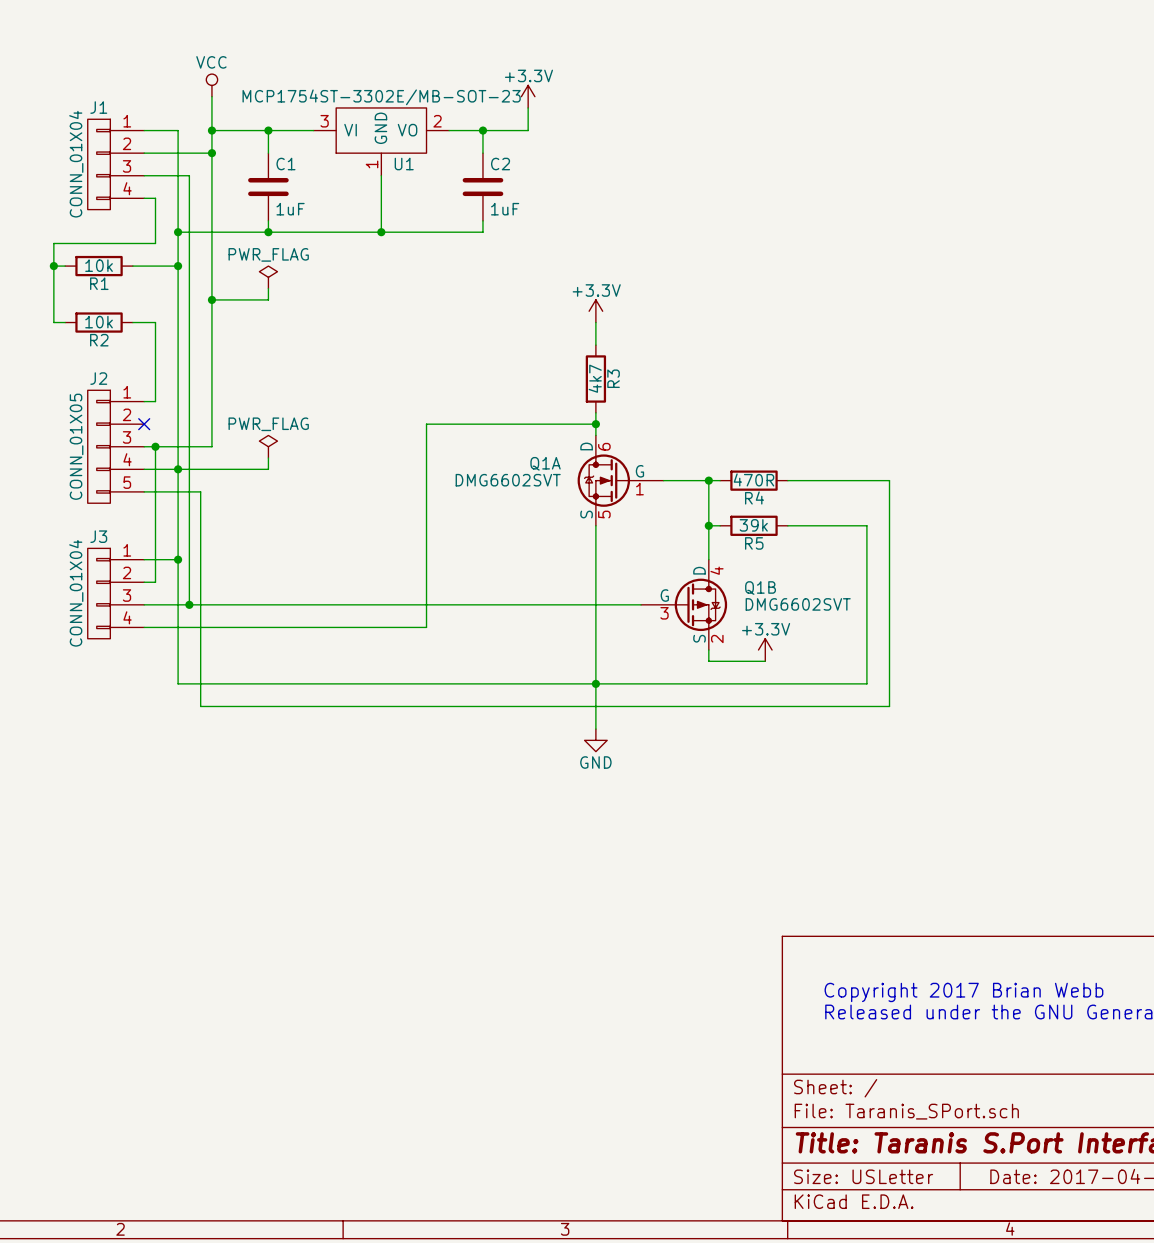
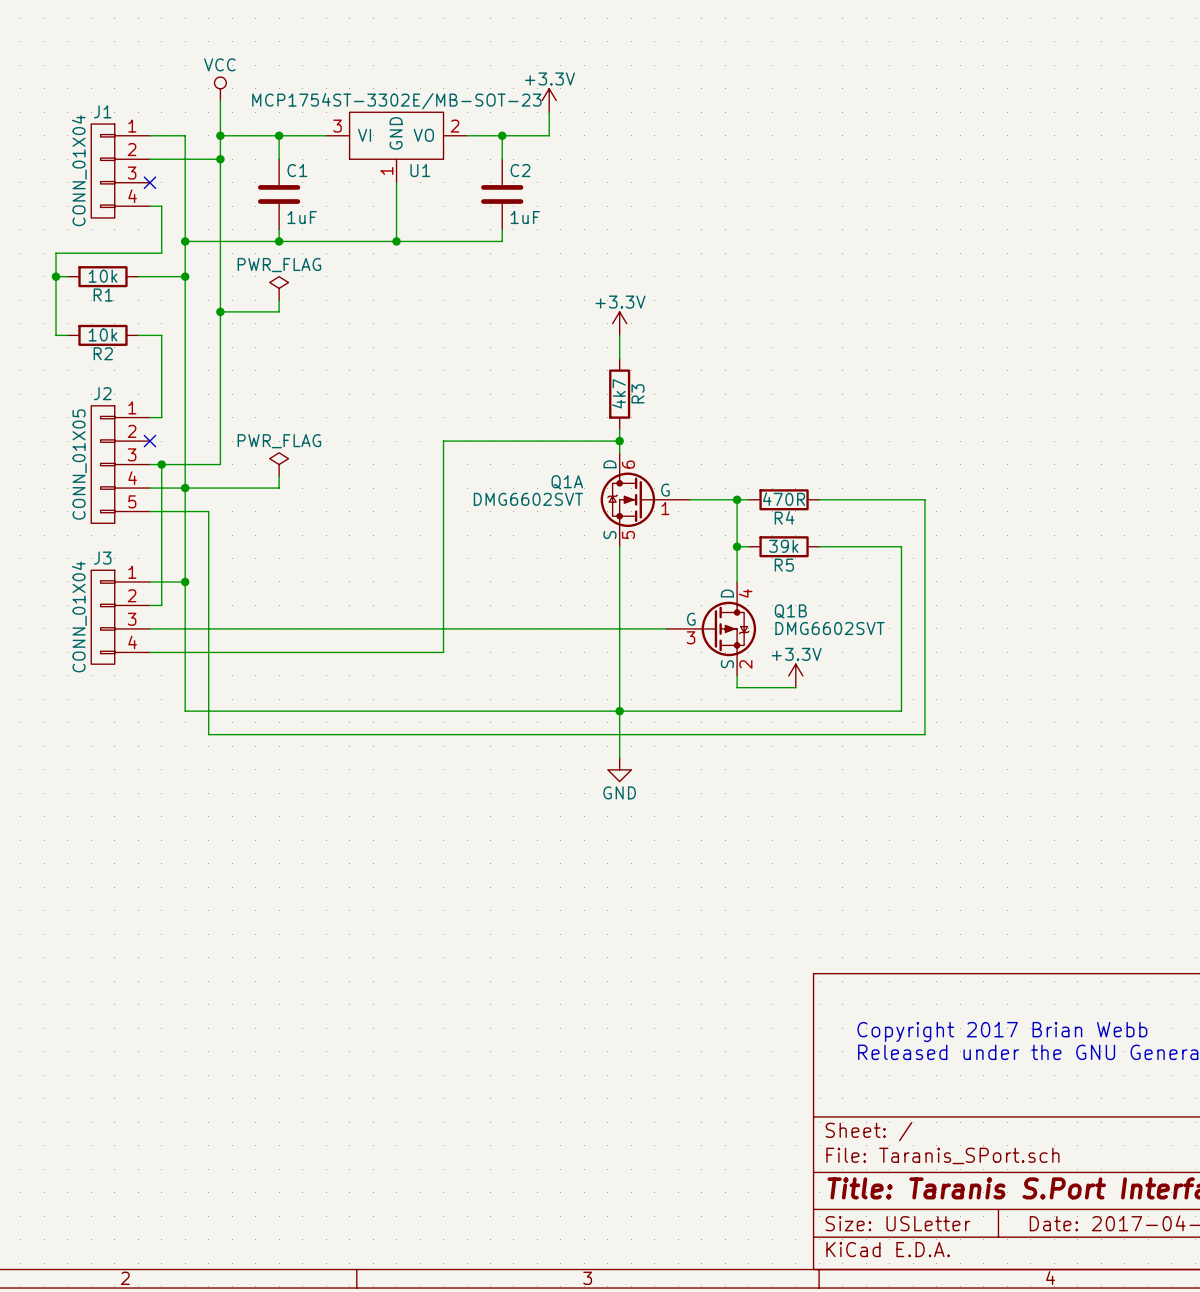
wire: (144, 175) (189, 175) (189, 604) -> none
no-connect mark: none -> (149, 182)
junction: (189, 604) -> none

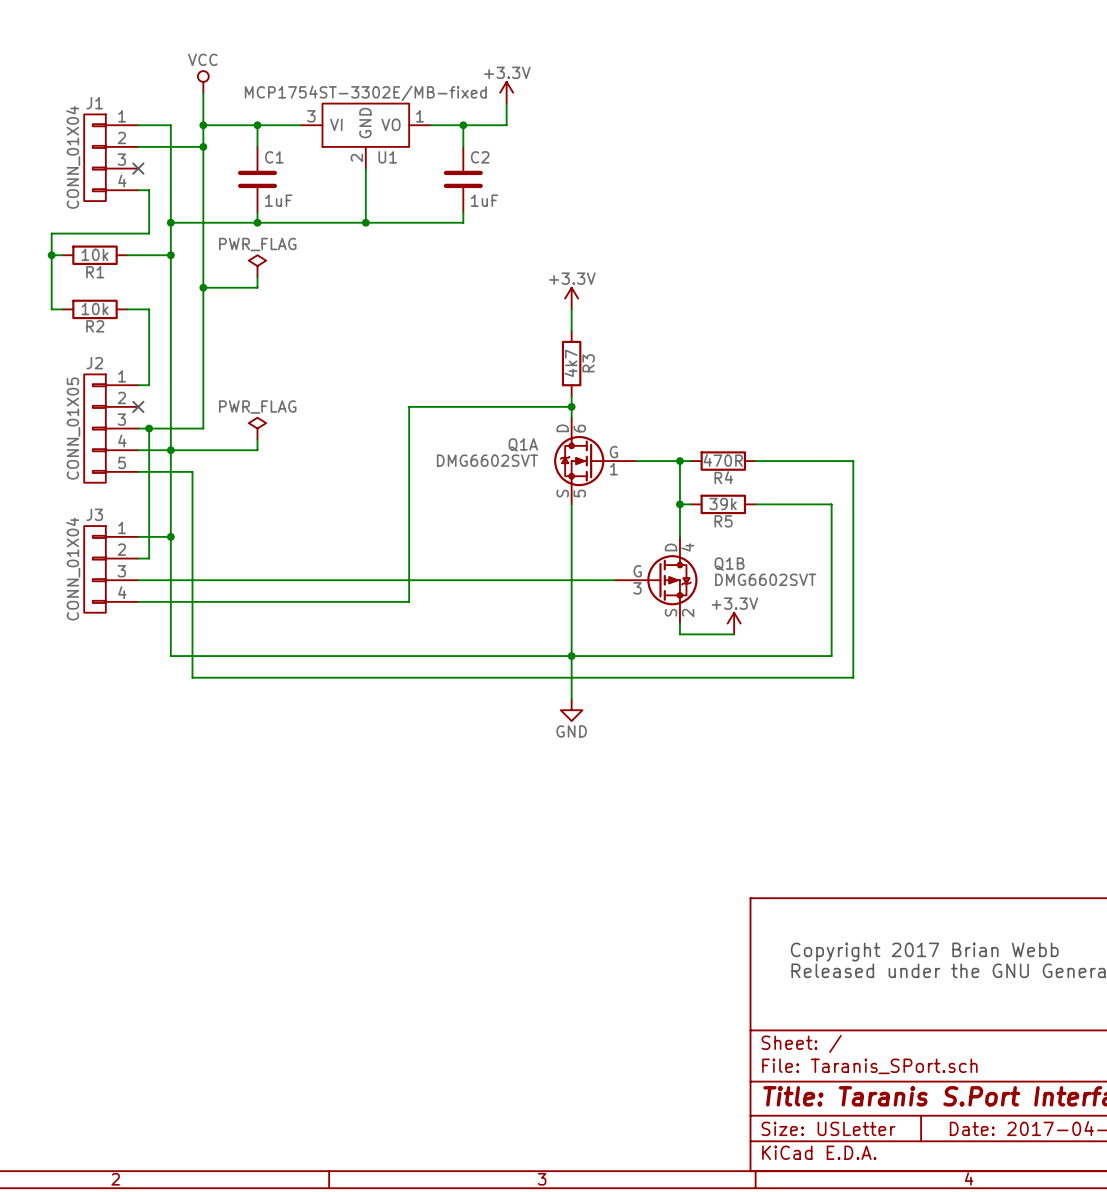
U1 value: MCP1754ST-3302E/MB-SOT-23 (396, 101) -> MCP1754ST-3302E/MB-fixed (365, 93)
U1 pin number: 2 (454, 126) -> 1 (419, 116)
U1 pin number: 1 (386, 170) -> 2 (356, 158)

